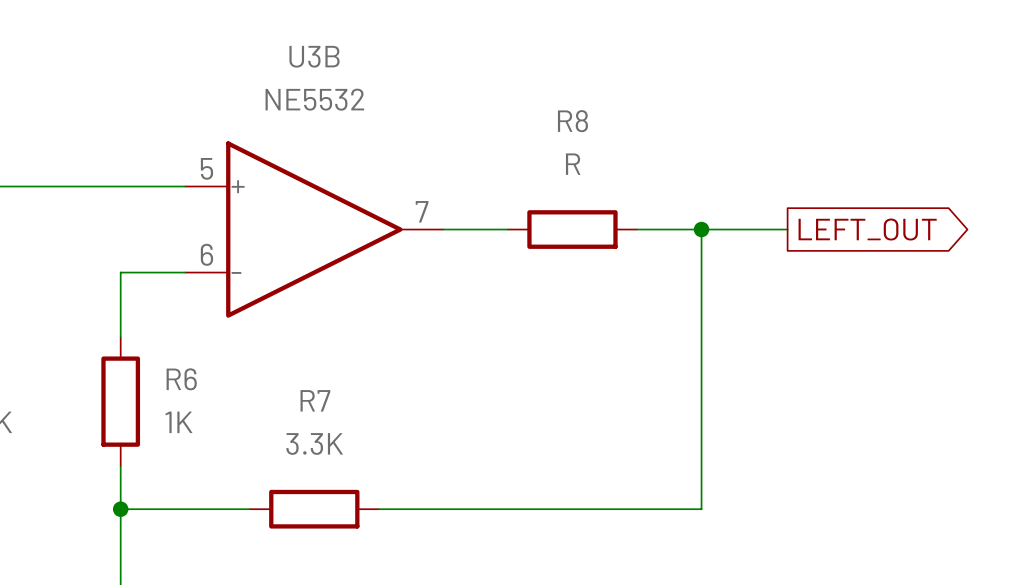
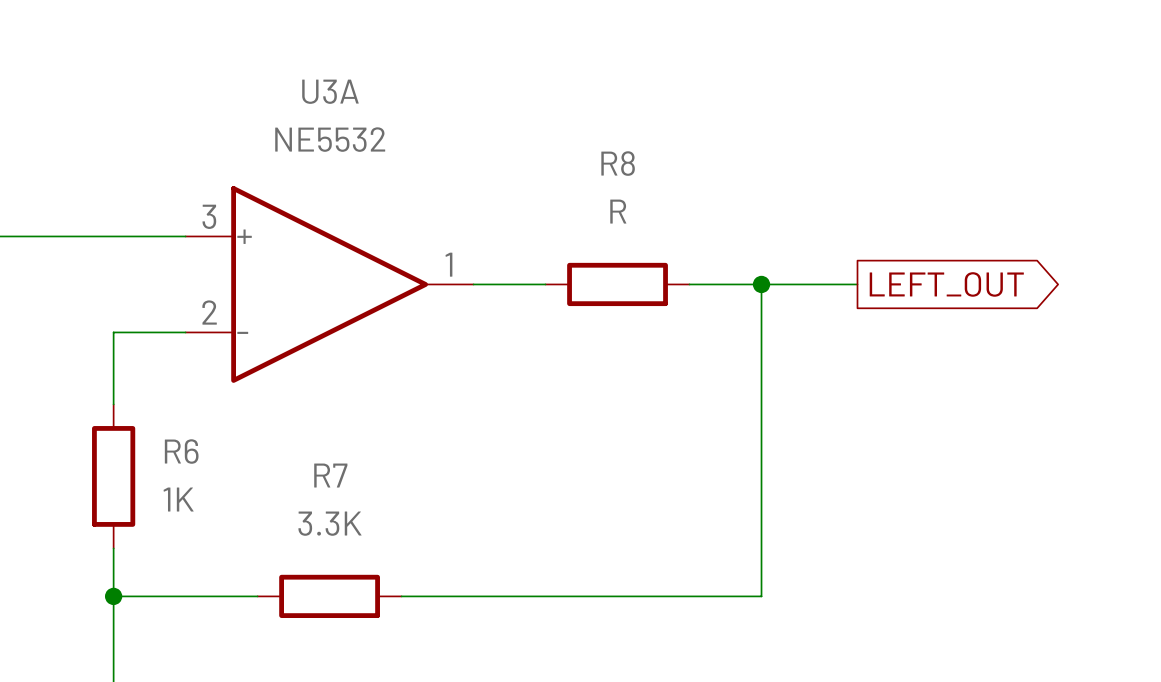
U3B name: U3B (314, 56) -> U3A (330, 91)
U3B pin number: 5 (206, 168) -> 3 (209, 216)
U3B pin number: 7 (422, 211) -> 1 (448, 264)
U3B pin number: 6 (206, 254) -> 2 (209, 312)

